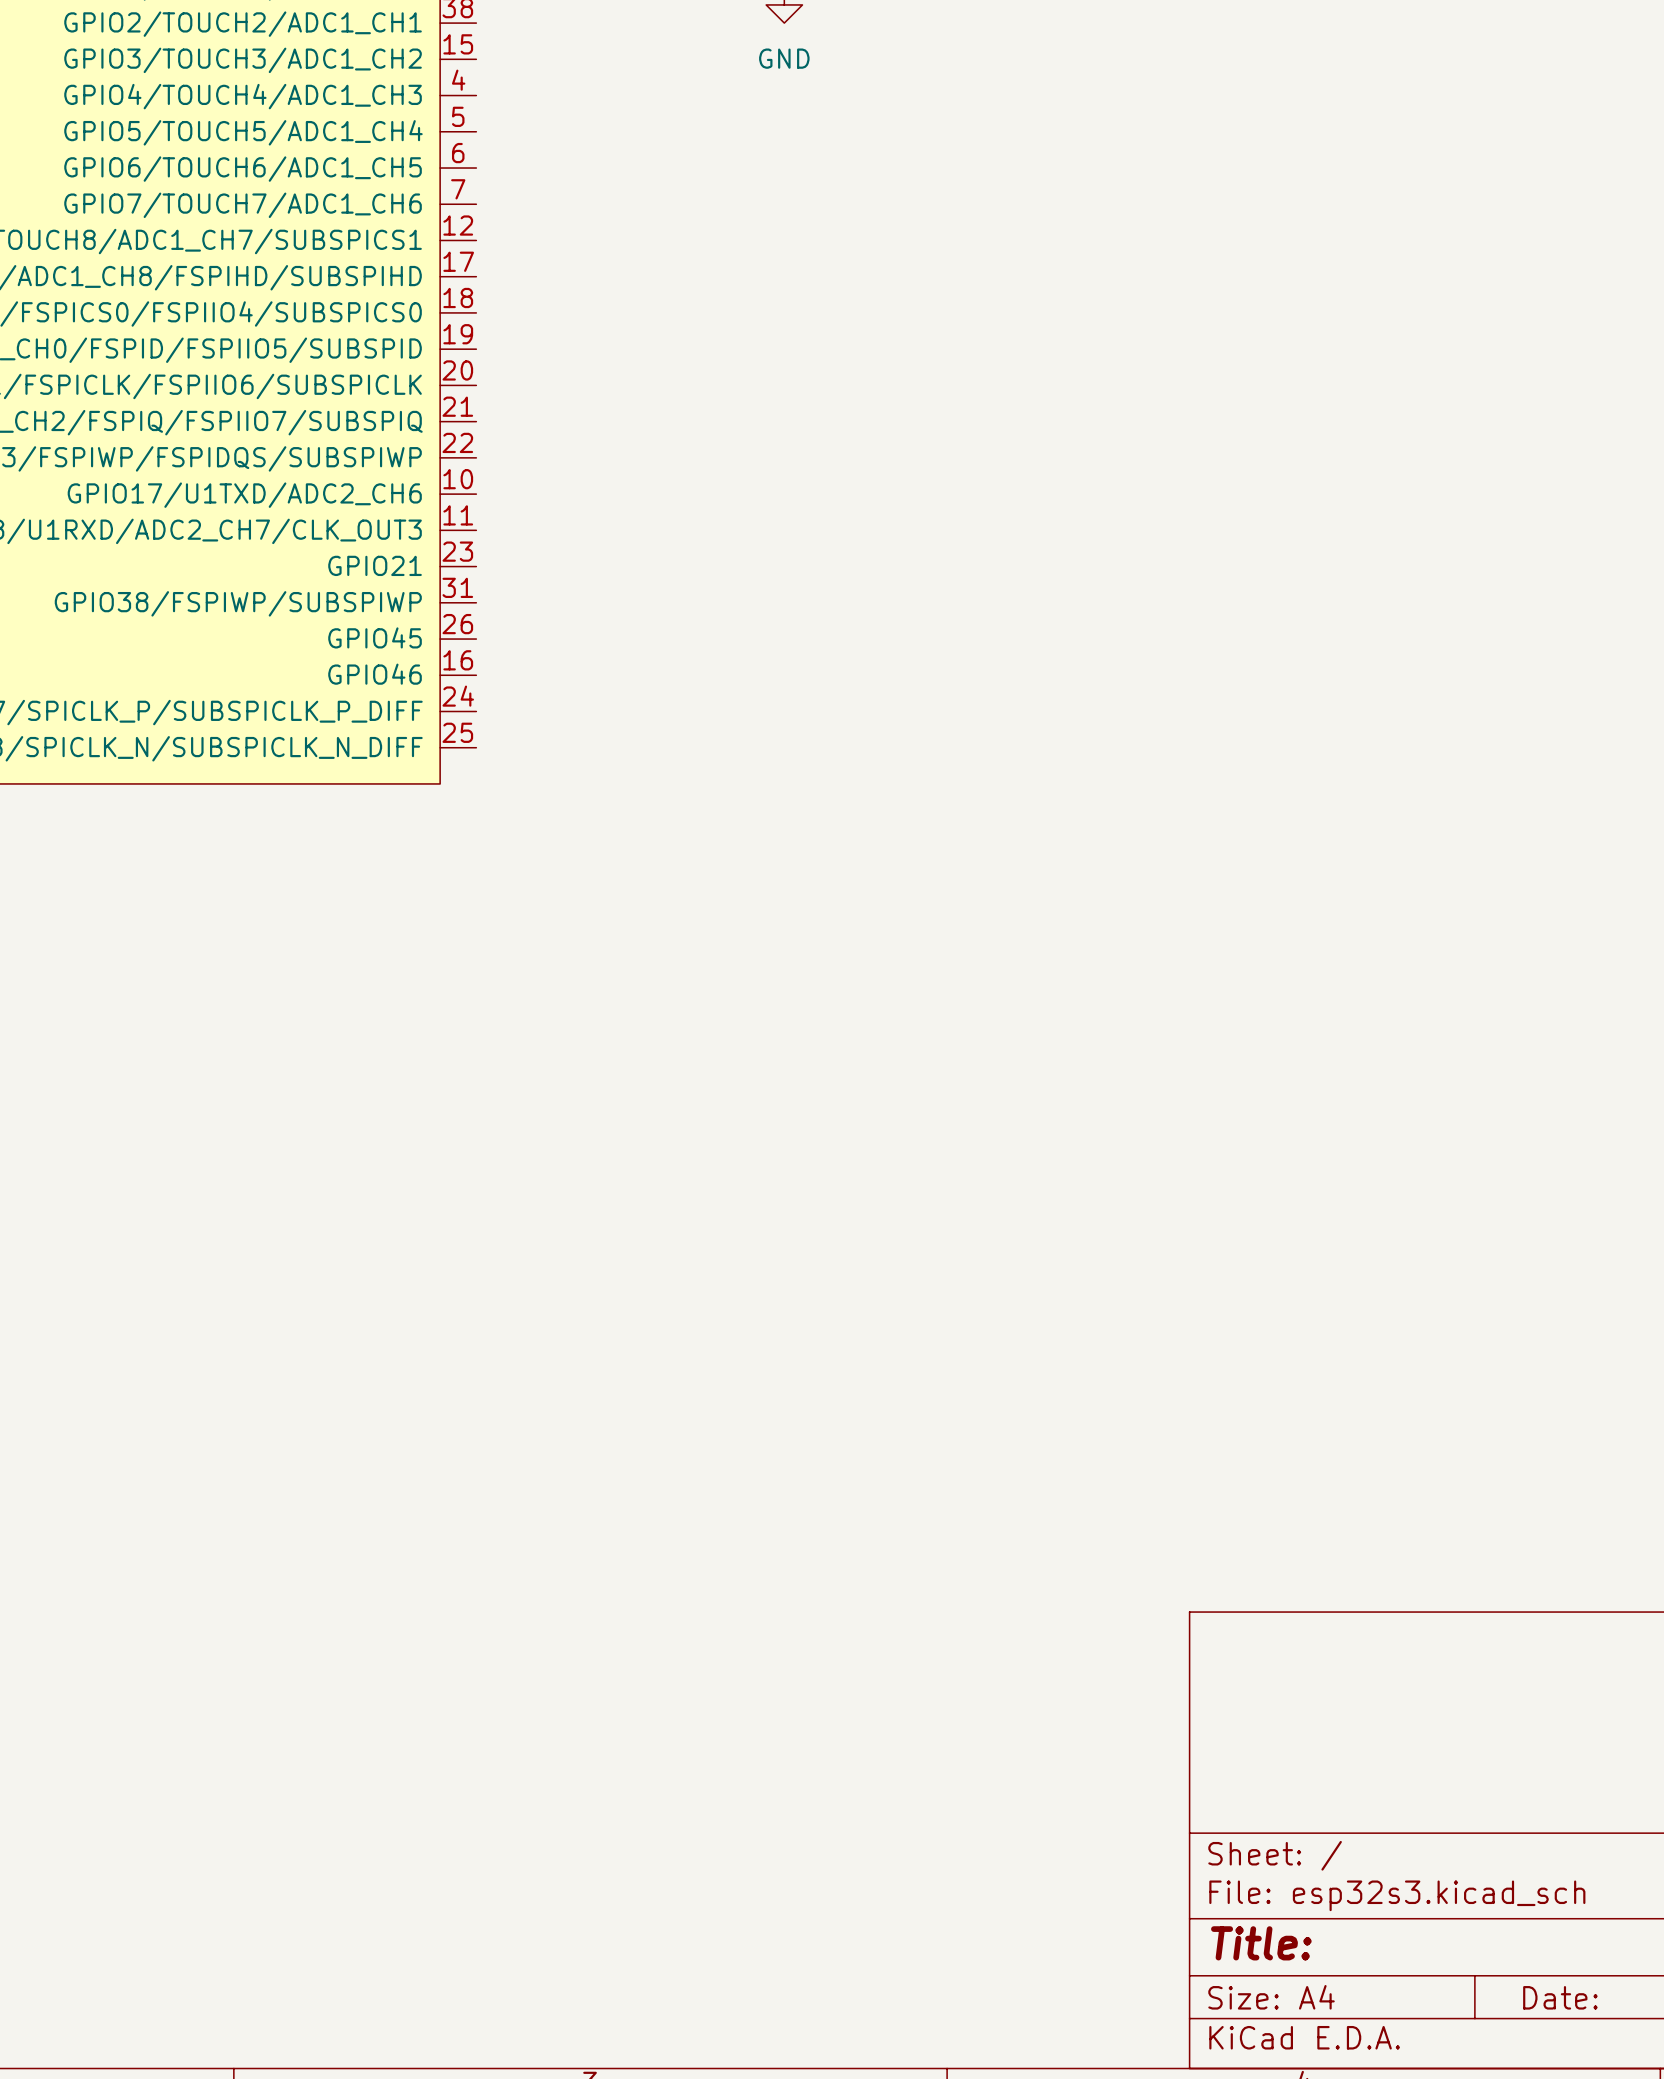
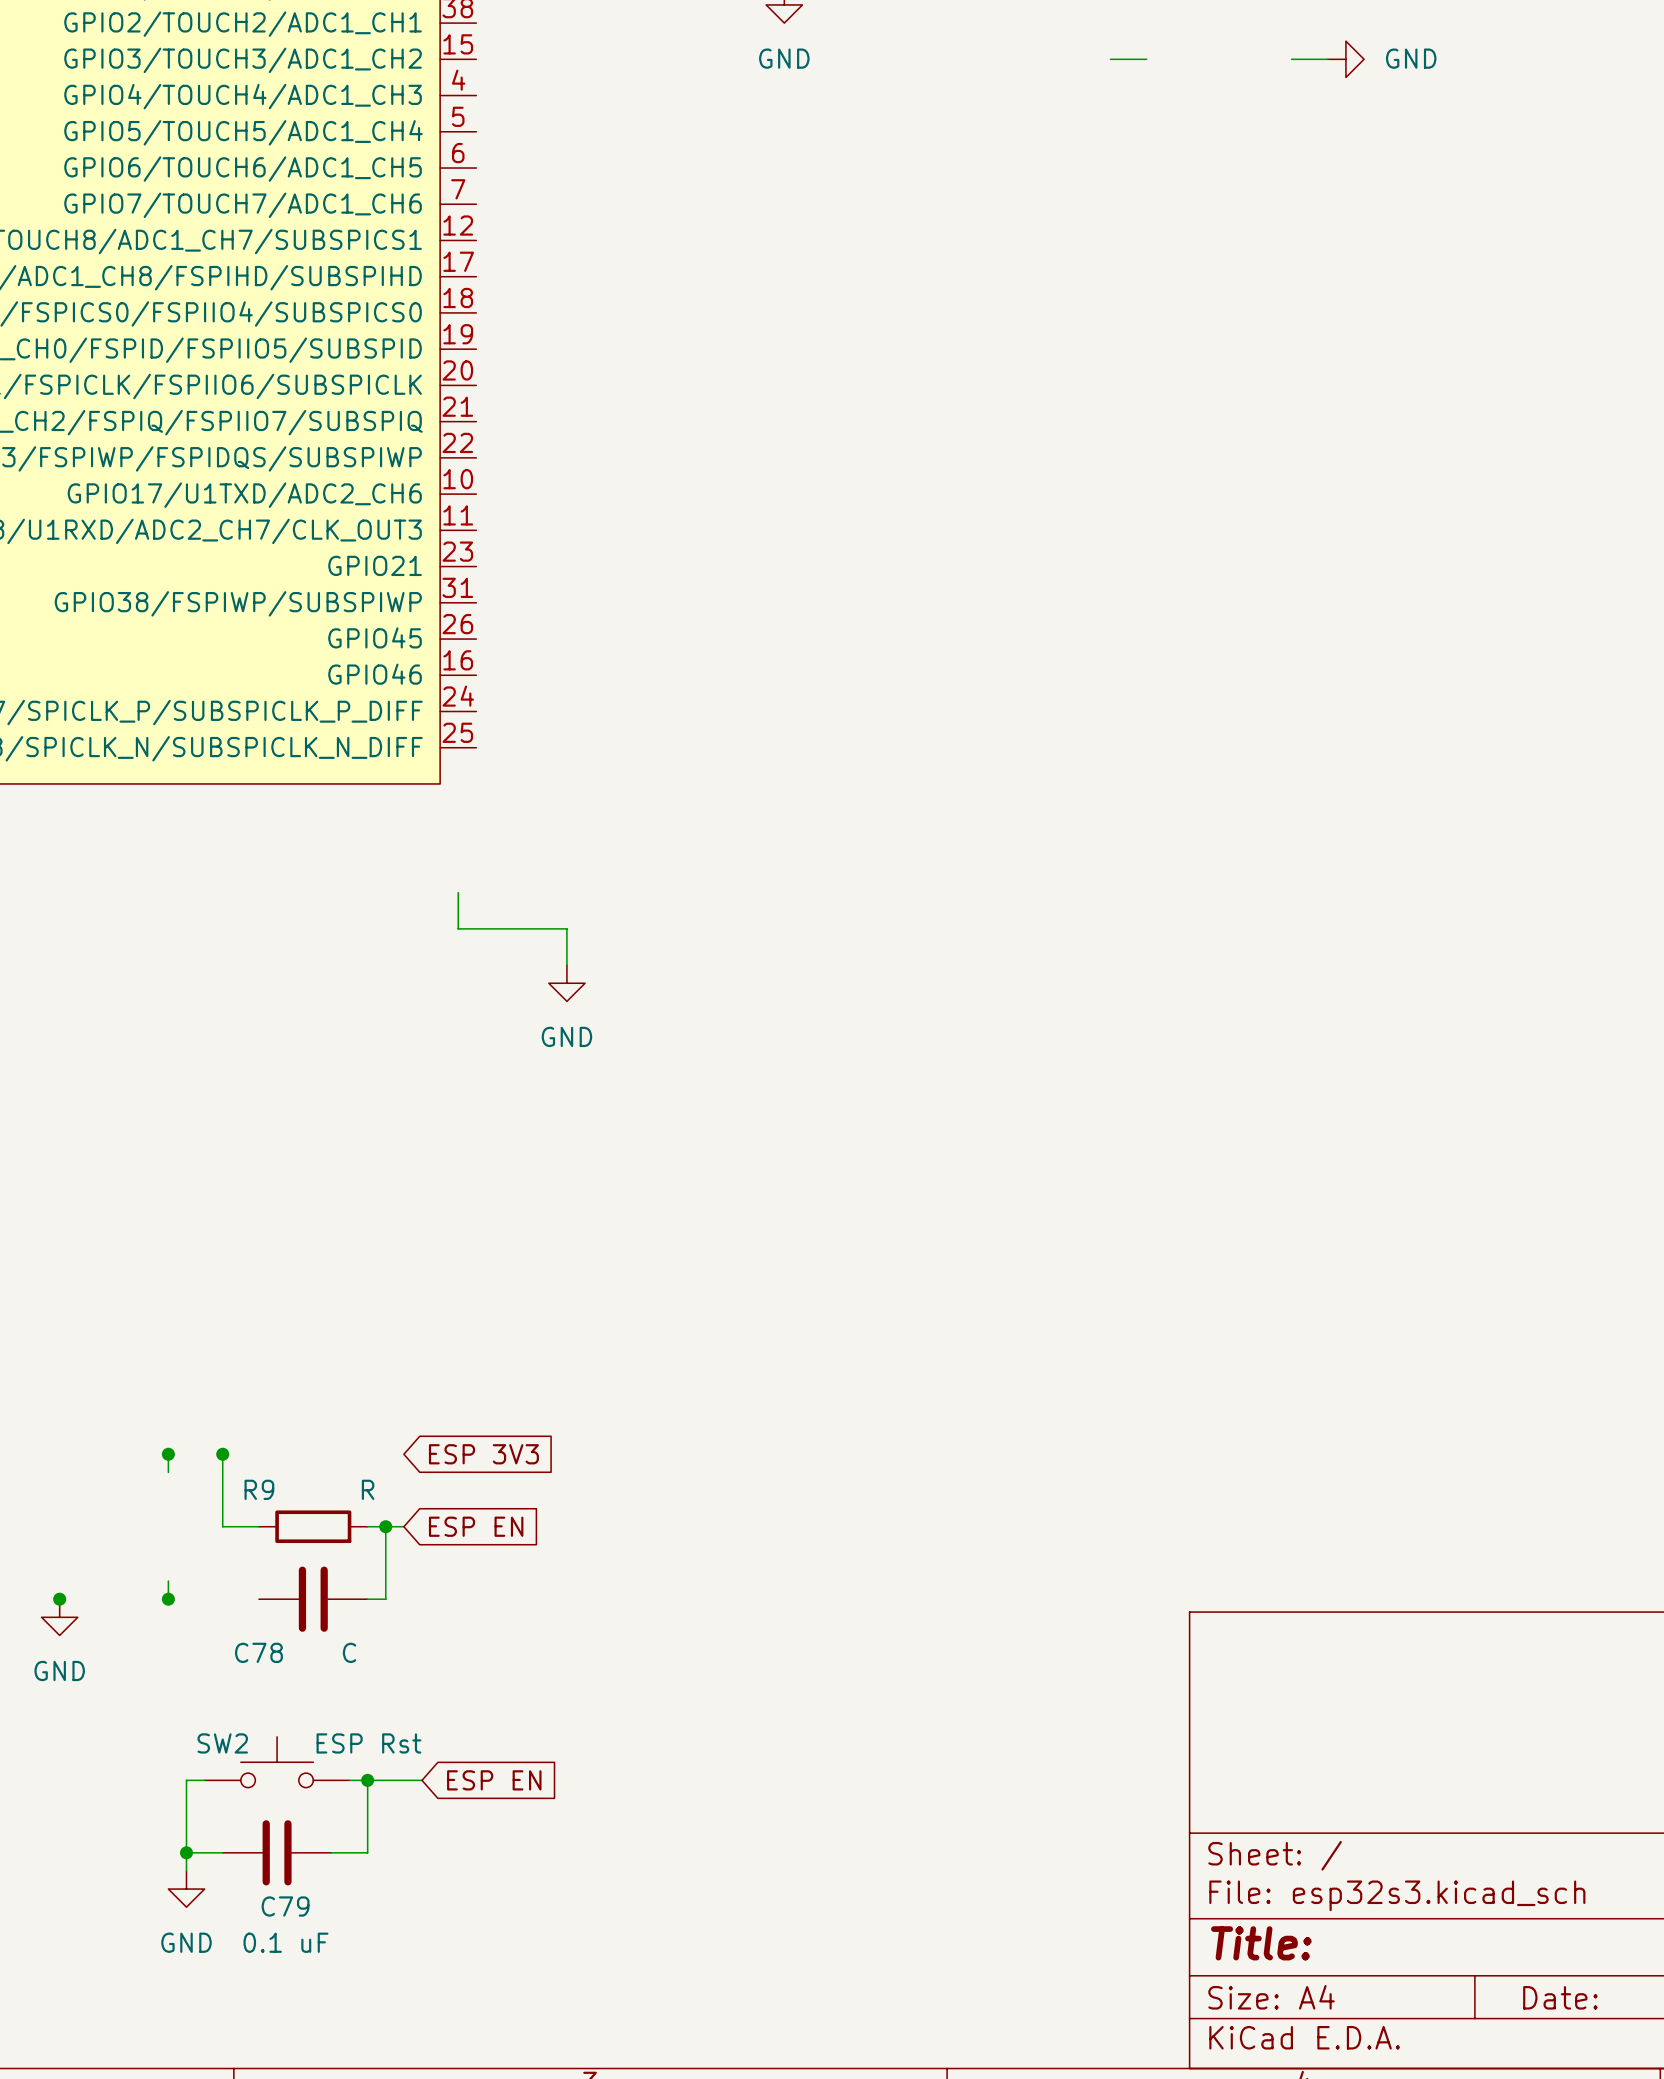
wire: none -> (1110, 59) (1146, 59)
wire: none -> (1291, 59) (1327, 59)
power symbol: none -> GND (1345, 59)
wire: none -> (458, 892) (458, 928) (566, 928) (566, 965)
power symbol: none -> GND (566, 983)
wire: none -> (168, 1454) (168, 1472)
junction: none -> (168, 1454)
wire: none -> (222, 1454) (222, 1526) (258, 1526)
junction: none -> (222, 1454)
global label: none -> ESP 3V3 (483, 1454)
R9: none -> R (313, 1526)
wire: none -> (367, 1526) (403, 1526)
wire: none -> (385, 1526) (385, 1599) (367, 1599)
junction: none -> (385, 1526)
global label: none -> ESP EN (476, 1526)
wire: none -> (168, 1581) (168, 1599)
junction: none -> (59, 1599)
junction: none -> (168, 1599)
C78: none -> C (313, 1599)
power symbol: none -> GND (59, 1617)
SW2: none -> ESP Rst (277, 1762)
wire: none -> (204, 1780) (186, 1780) (186, 1870)
wire: none -> (349, 1780) (422, 1780)
wire: none -> (367, 1780) (367, 1852) (331, 1852)
junction: none -> (367, 1780)
global label: none -> ESP EN (494, 1780)
wire: none -> (186, 1852) (222, 1852)
junction: none -> (186, 1852)
C79: none -> 0.1 uF (277, 1852)
power symbol: none -> GND (186, 1889)

